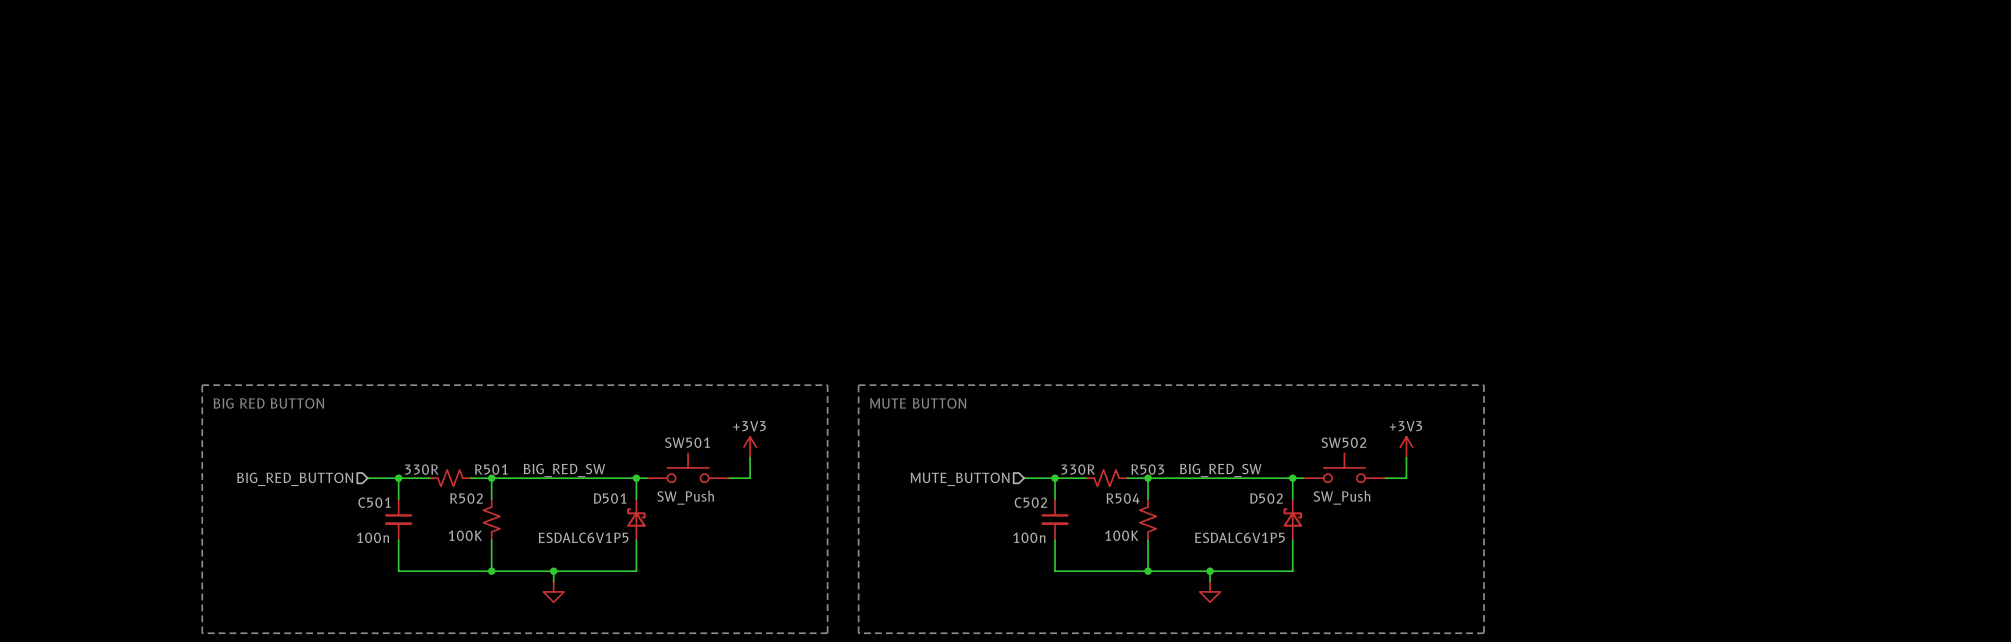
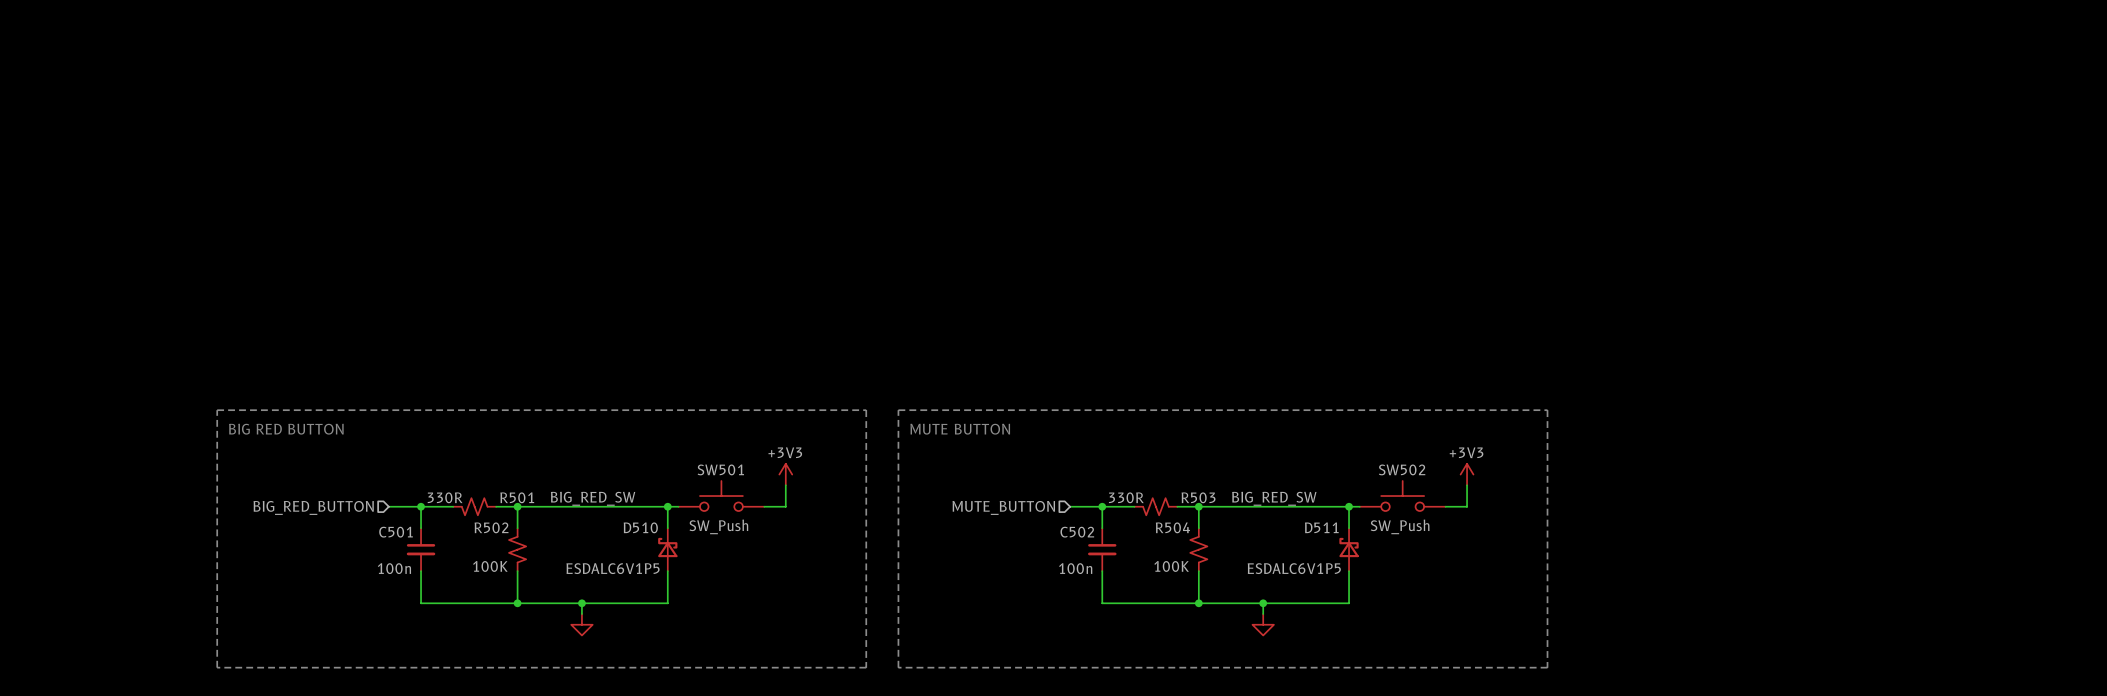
D501 name: D501 (610, 498) -> D510 (640, 527)
D502 name: D502 (1266, 498) -> D511 (1321, 527)

